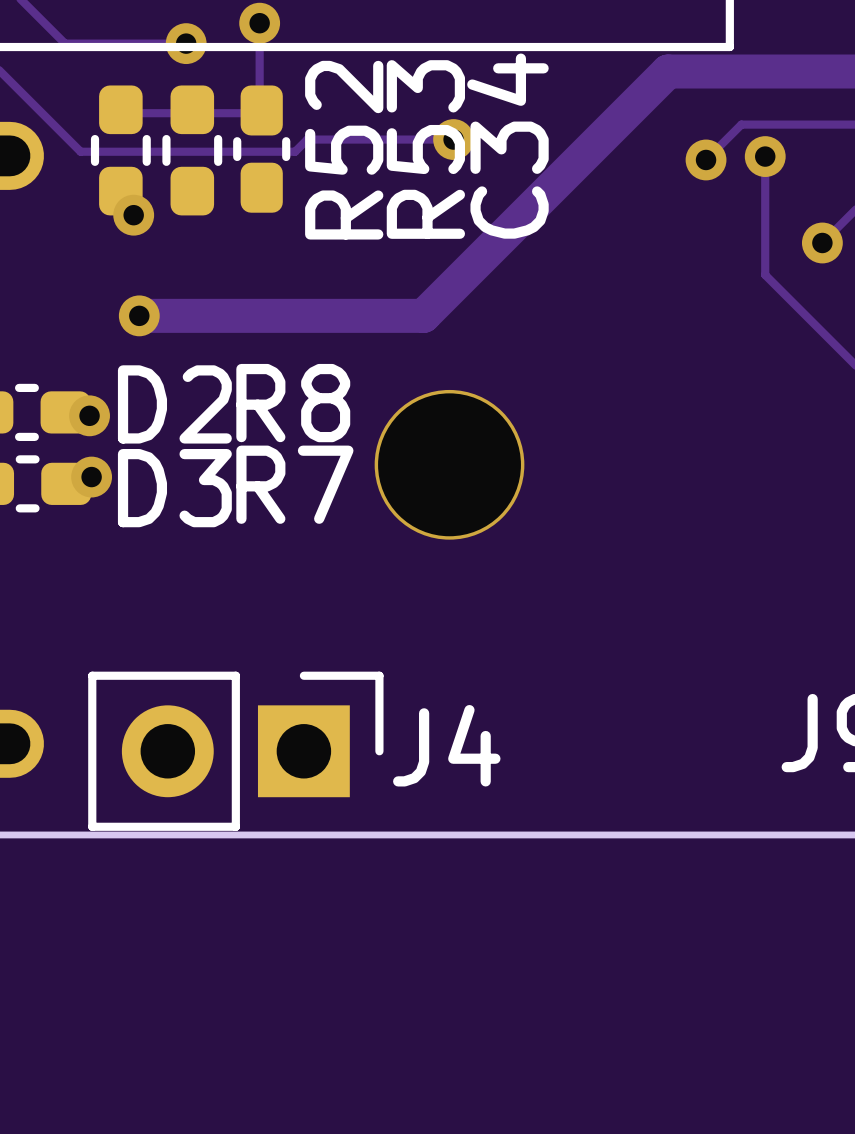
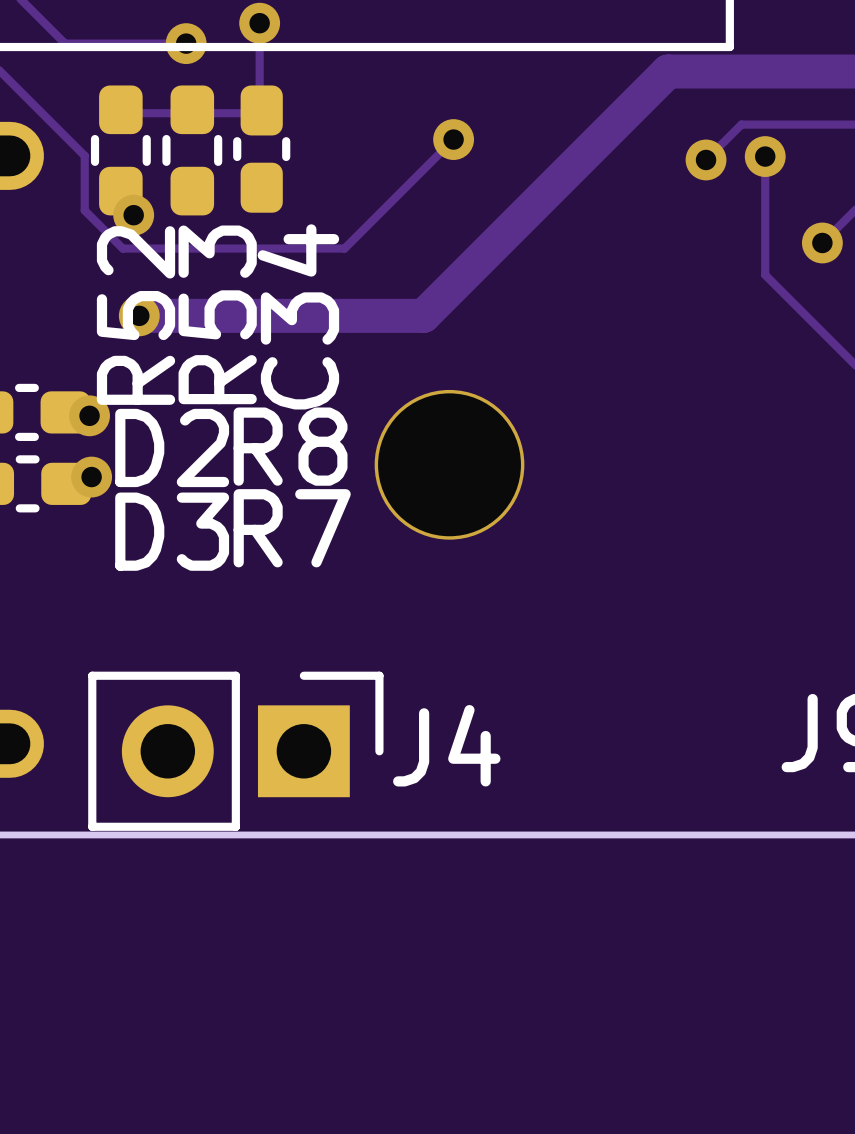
track: (453, 139) (307, 139) (295, 151) (80, 151) -> (453, 139) (344, 248) (122, 248) (84, 210) (84, 155) (80, 151)
C34 name position: C34 (507, 146) -> C34 (298, 316)
R53 name position: R53 (425, 149) -> R53 (217, 314)
R52 name position: R52 (344, 150) -> R52 (136, 315)
R8 name position: R8 (293, 403) -> R8 (290, 446)
D2 name position: D2 (174, 404) -> D2 (172, 447)
R7 name position: R7 (294, 484) -> R7 (292, 528)
D3 name position: D3 (174, 488) -> D3 (172, 531)

